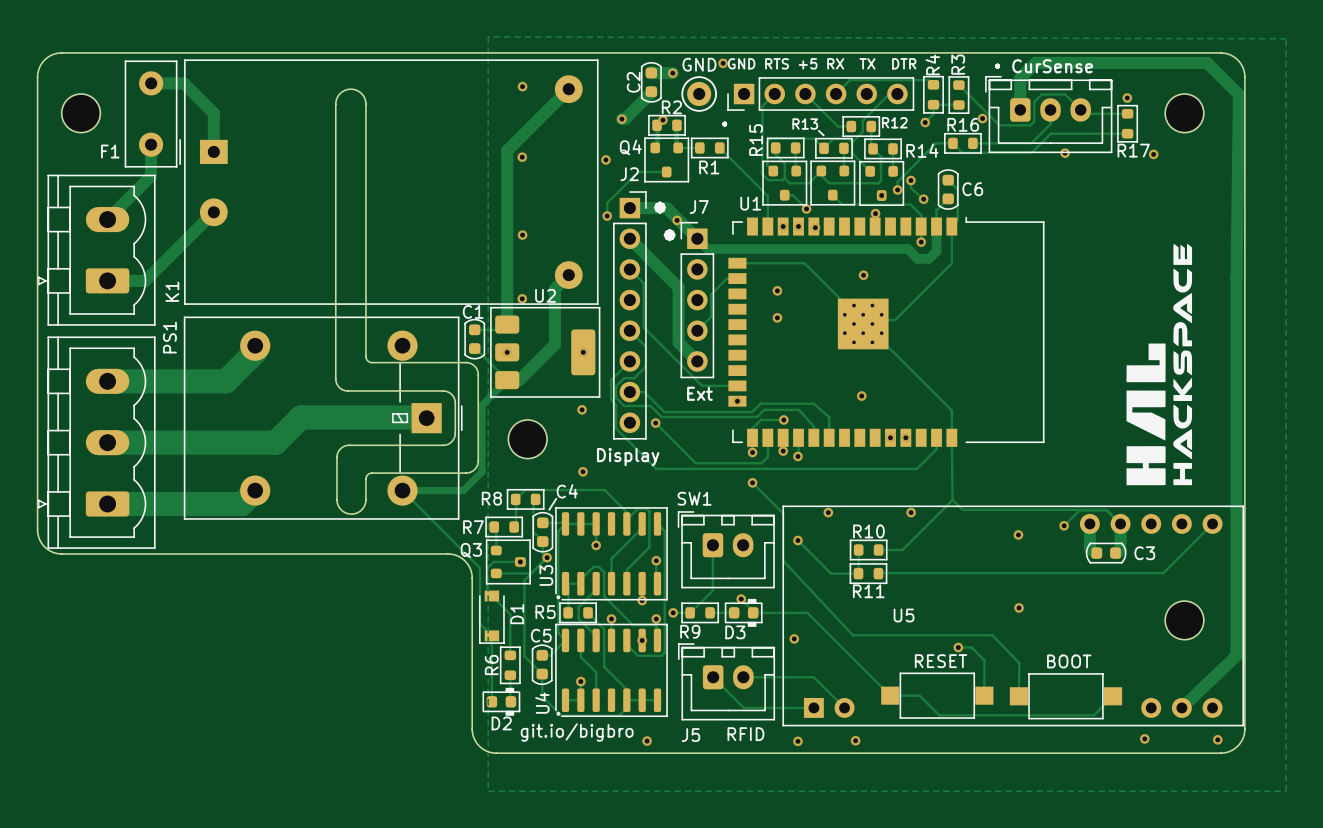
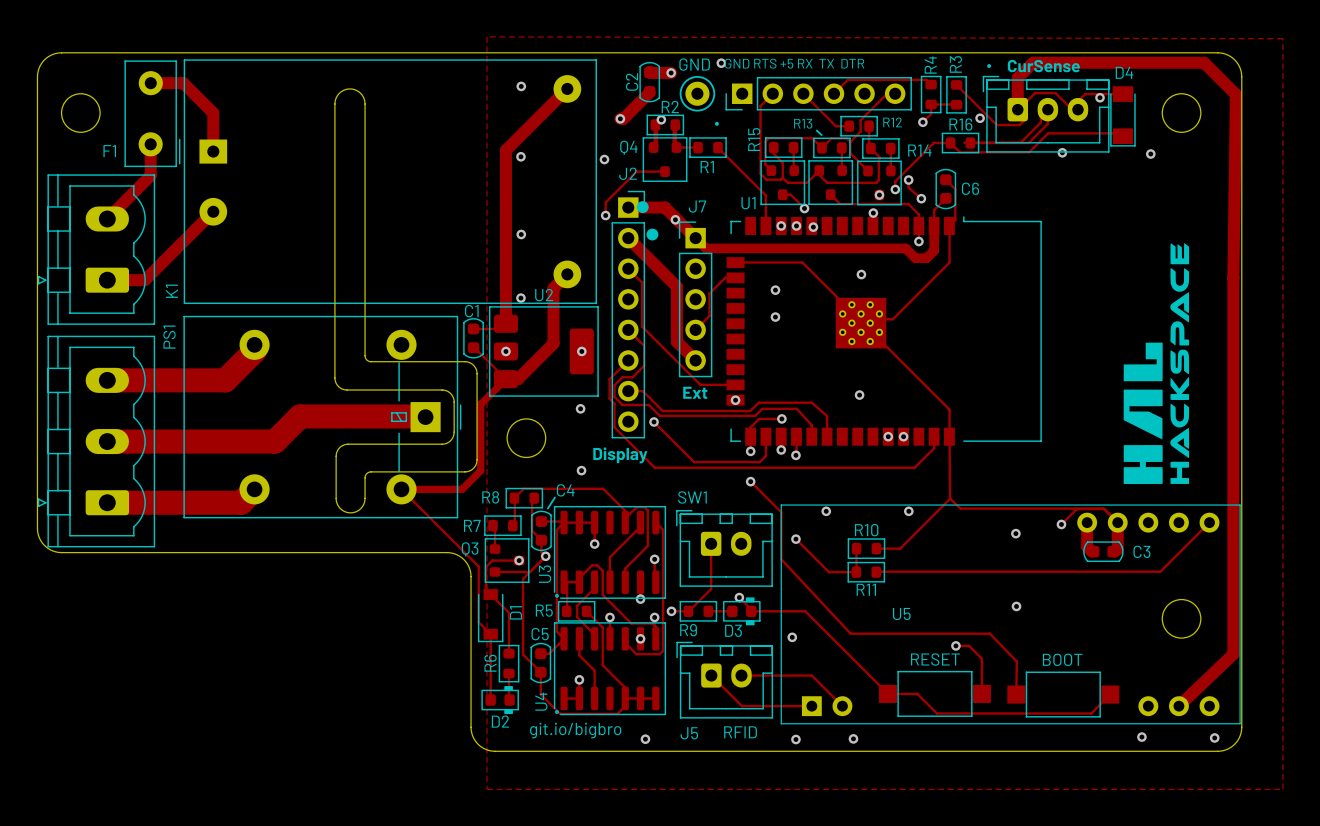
via position: (1127, 97) -> (1100, 97)
track: none -> (1040, 108) (1040, 122) (1020, 142) (964, 142)
track: (1127, 113) (1084, 113) (1065, 94) (1041, 94) (1034, 102) (1034, 121) (1030, 125) (1022, 125) -> (1122, 94) (1085, 94) (1070, 108) (1055, 93) (1035, 93) (1024, 103) (1024, 120) (1019, 125)
D4: none -> (1122, 116)
R17: (1127, 123) -> none

